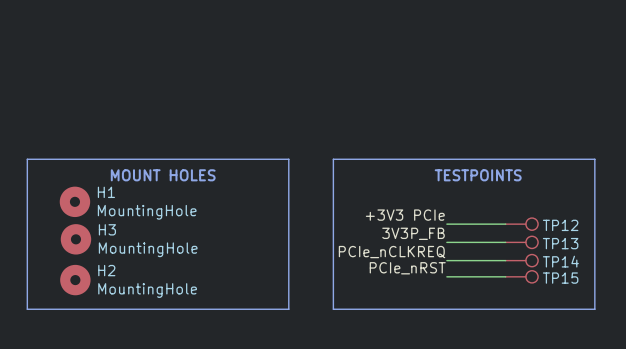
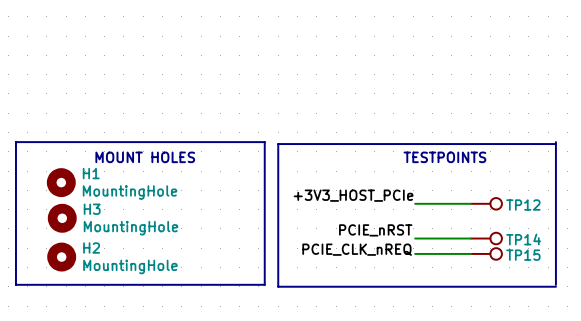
line: (594, 159) (333, 159) (333, 309) (594, 309) -> none
line: none -> (555, 144) (278, 144) (278, 286) (555, 286)
label: +3V3 PCIe (405, 215) -> +3V3_HOST_PCIe (353, 195)
label: 3V3P_FB (413, 233) -> none
wire: (446, 242) (505, 242) -> none
TP13: (521, 242) -> none
label: PCIe_nCLKREQ (392, 252) -> PCIE_nRST (375, 230)
label: PCIe_nRST (407, 268) -> PCIE_CLK_nREQ (357, 249)

